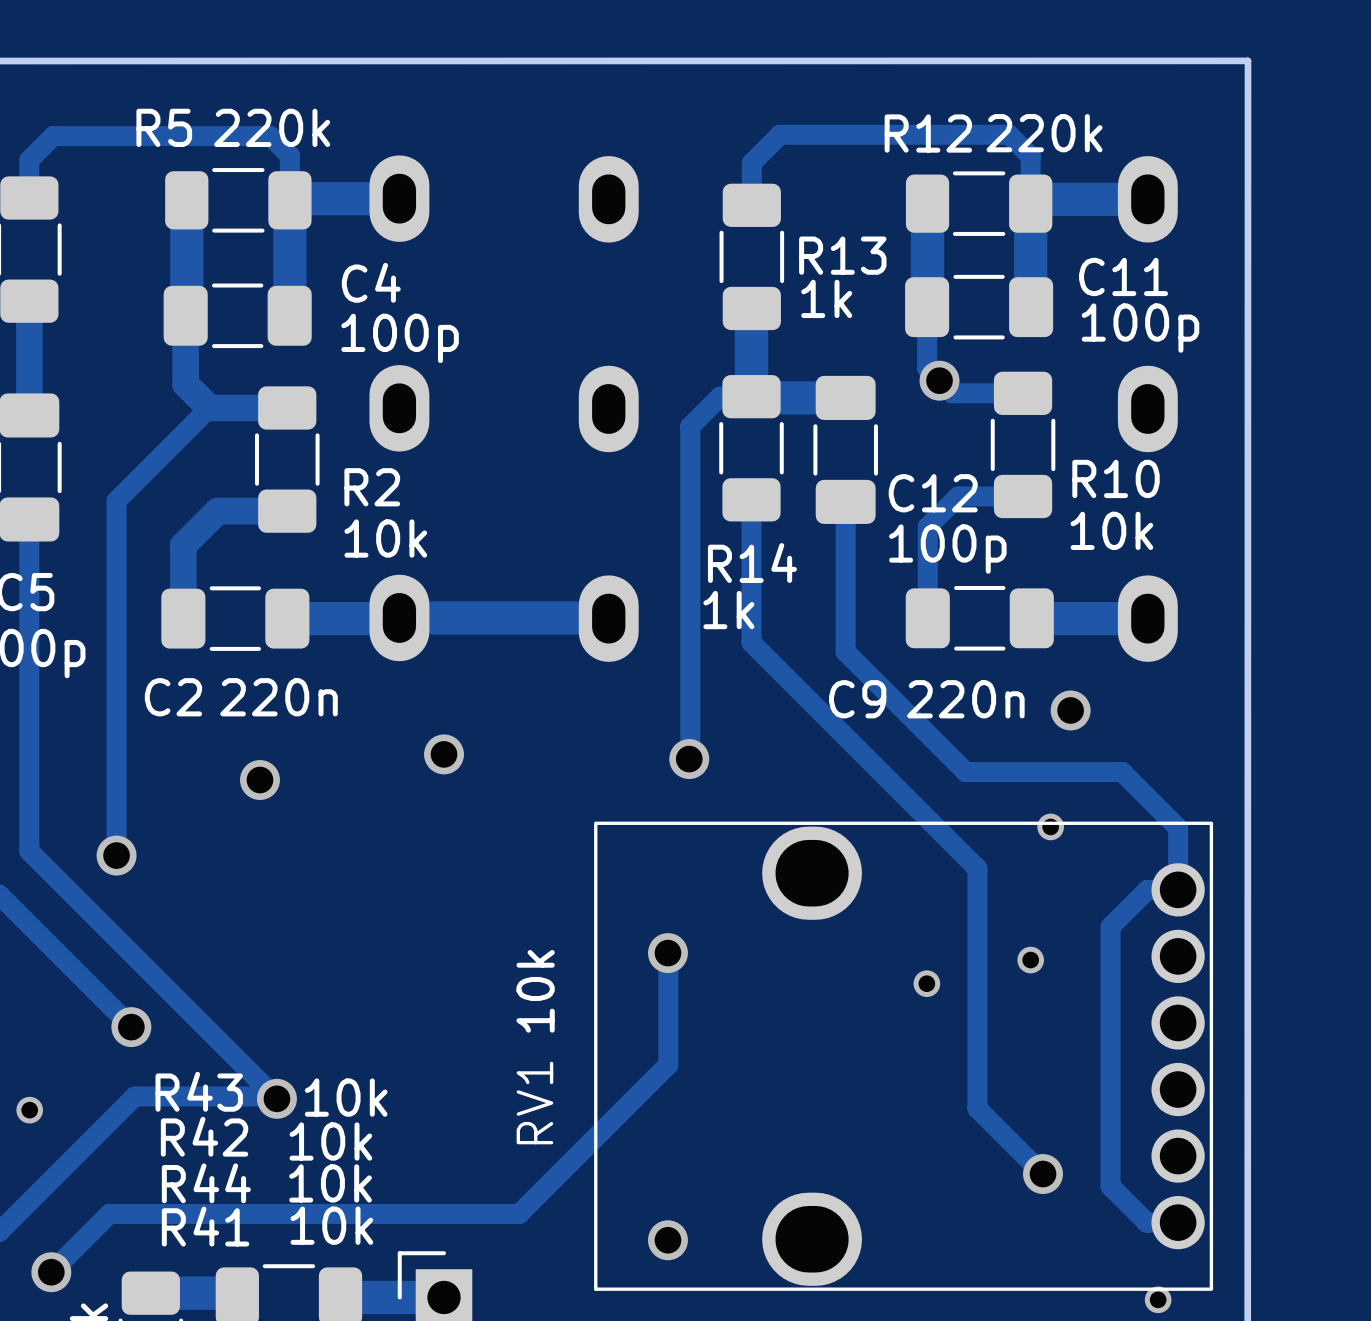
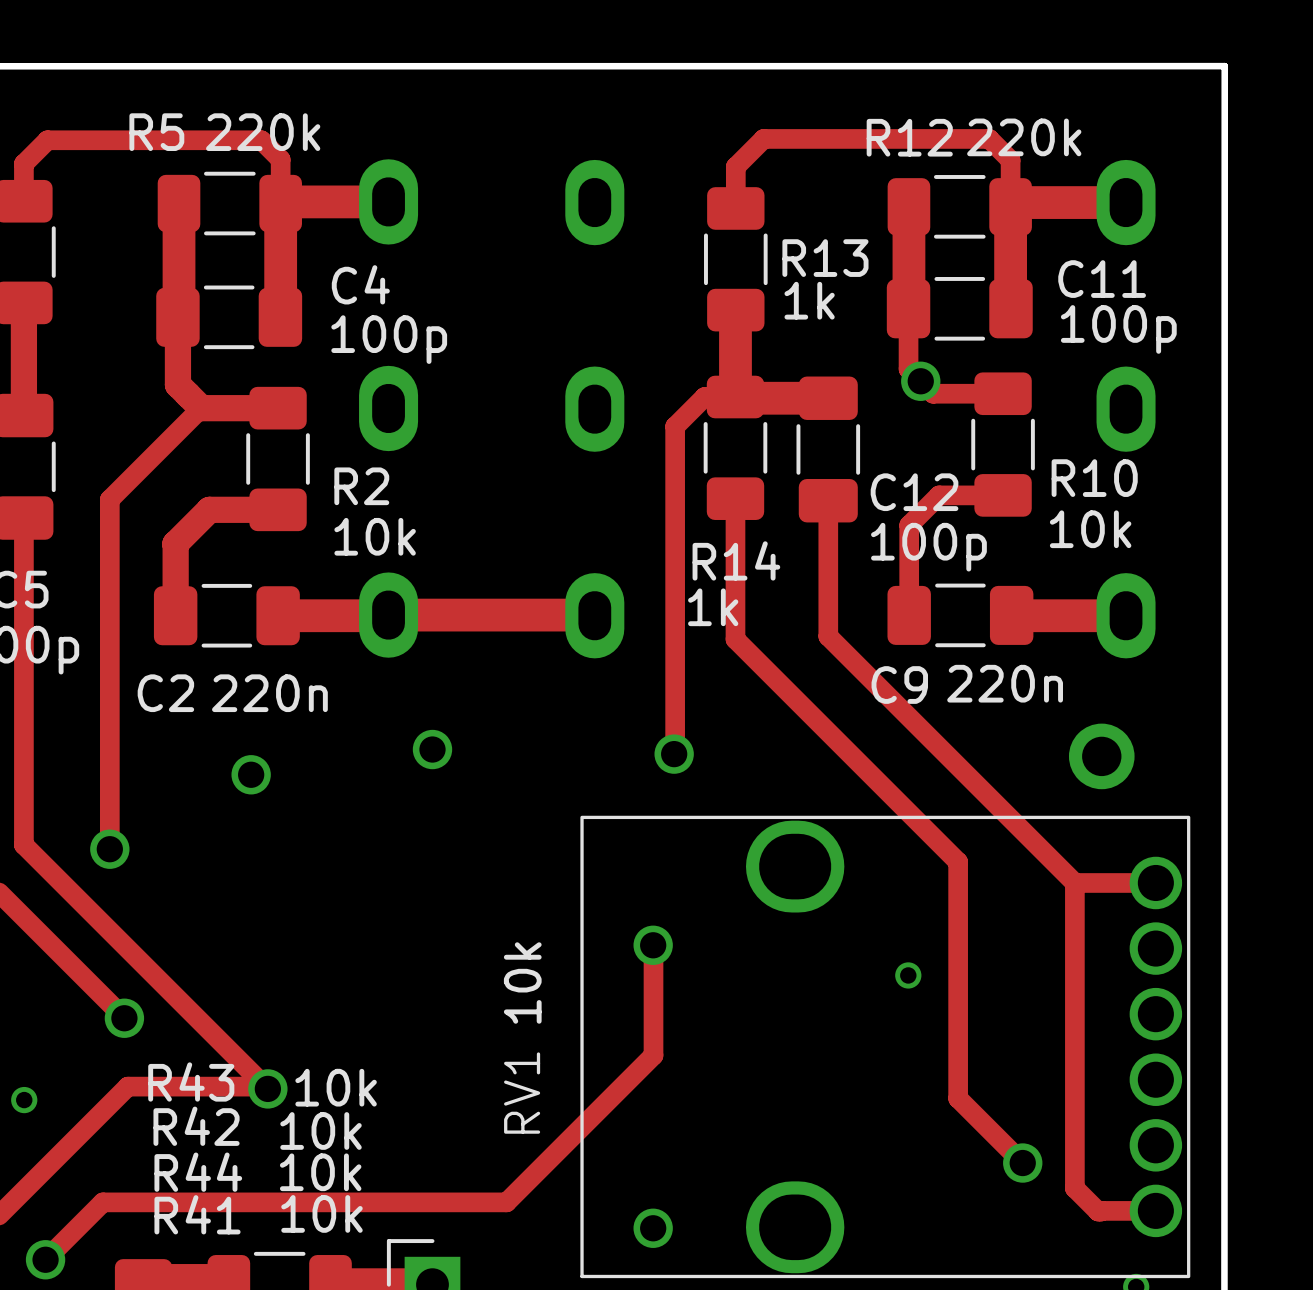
track: (845, 639) (845, 651) (965, 772) (1122, 772) (1178, 827) (1178, 889) -> (828, 636) (1074, 882)
C9 name position: C9 (857, 699) -> C9 (899, 685)
C9 value position: 220n (965, 699) -> 220n (1005, 683)
via: (1070, 710) -> none
via: none -> (1101, 756)
via: (1050, 826) -> none
track: none -> (1074, 882) (1125, 882)
track: (1147, 889) (1110, 926) (1110, 1186) (1146, 1222) -> (1074, 882) (1074, 1188) (1098, 1211) (1125, 1210)
via: (1030, 960) -> none

